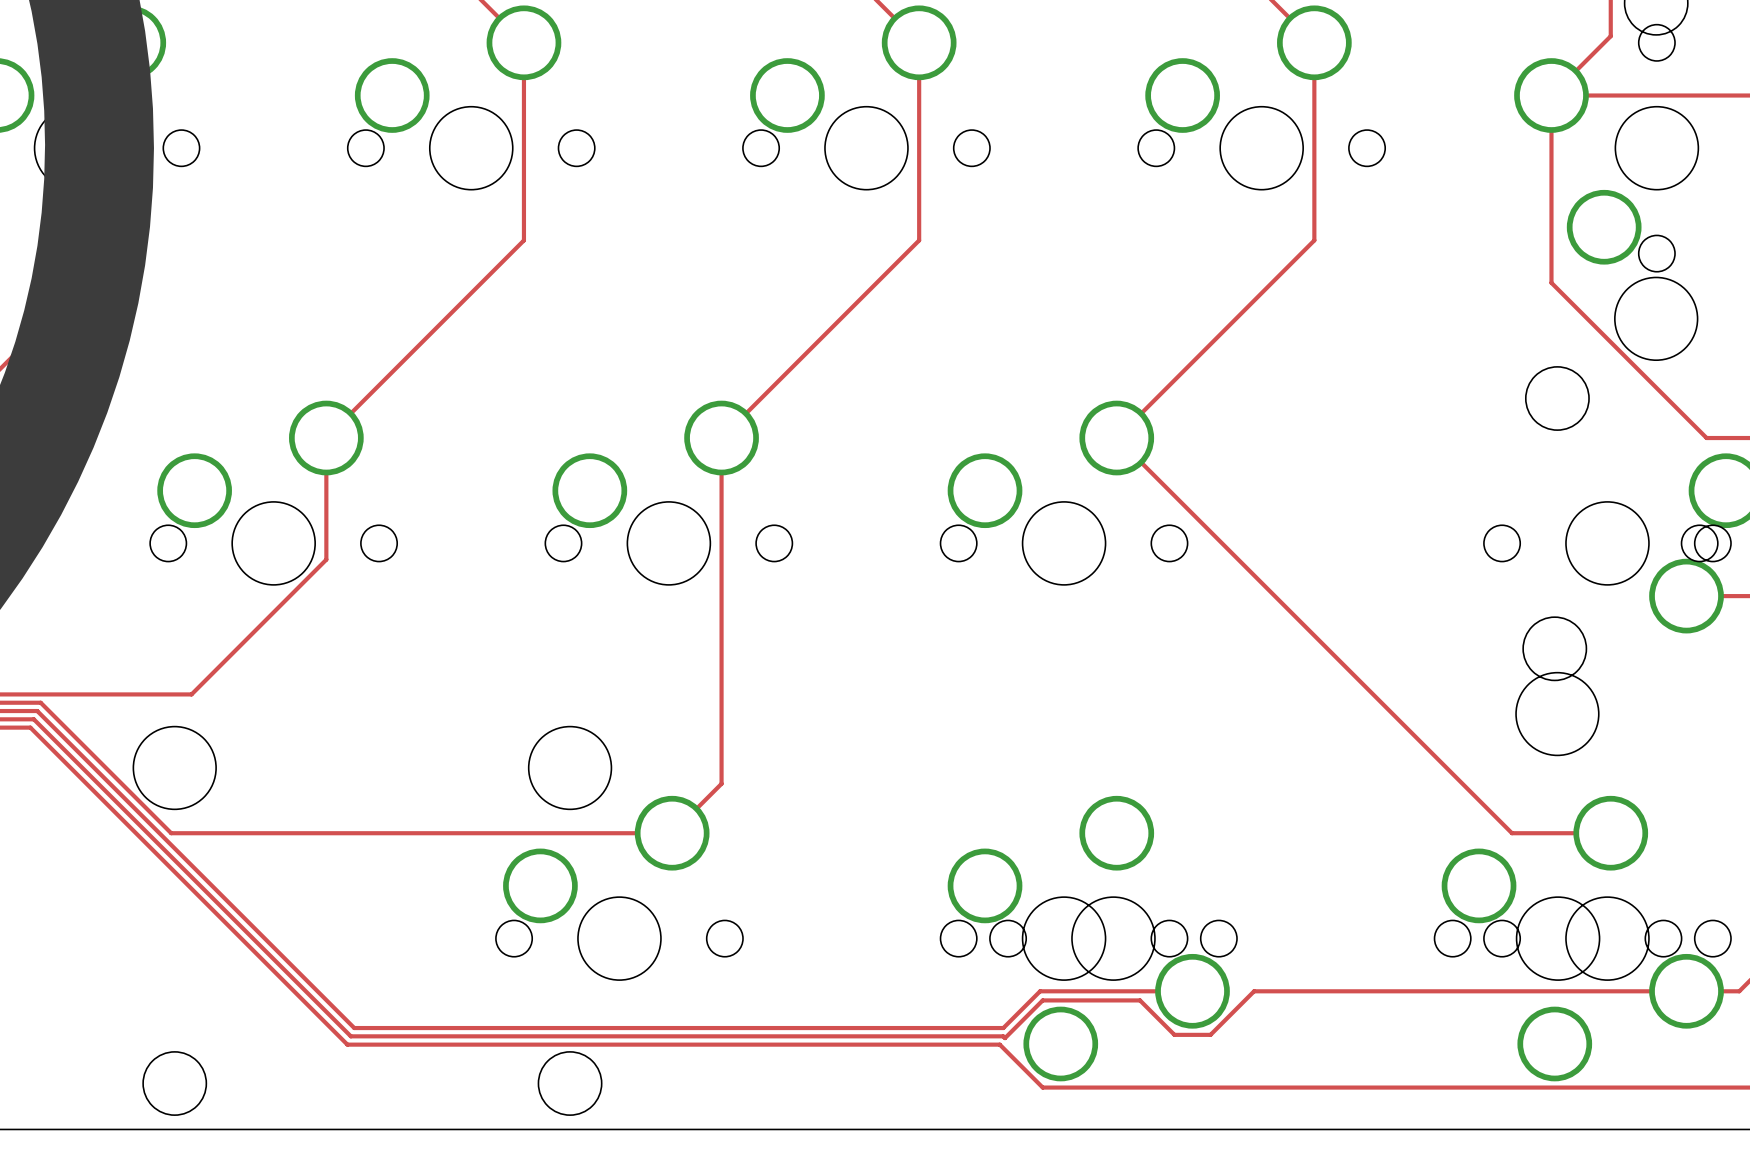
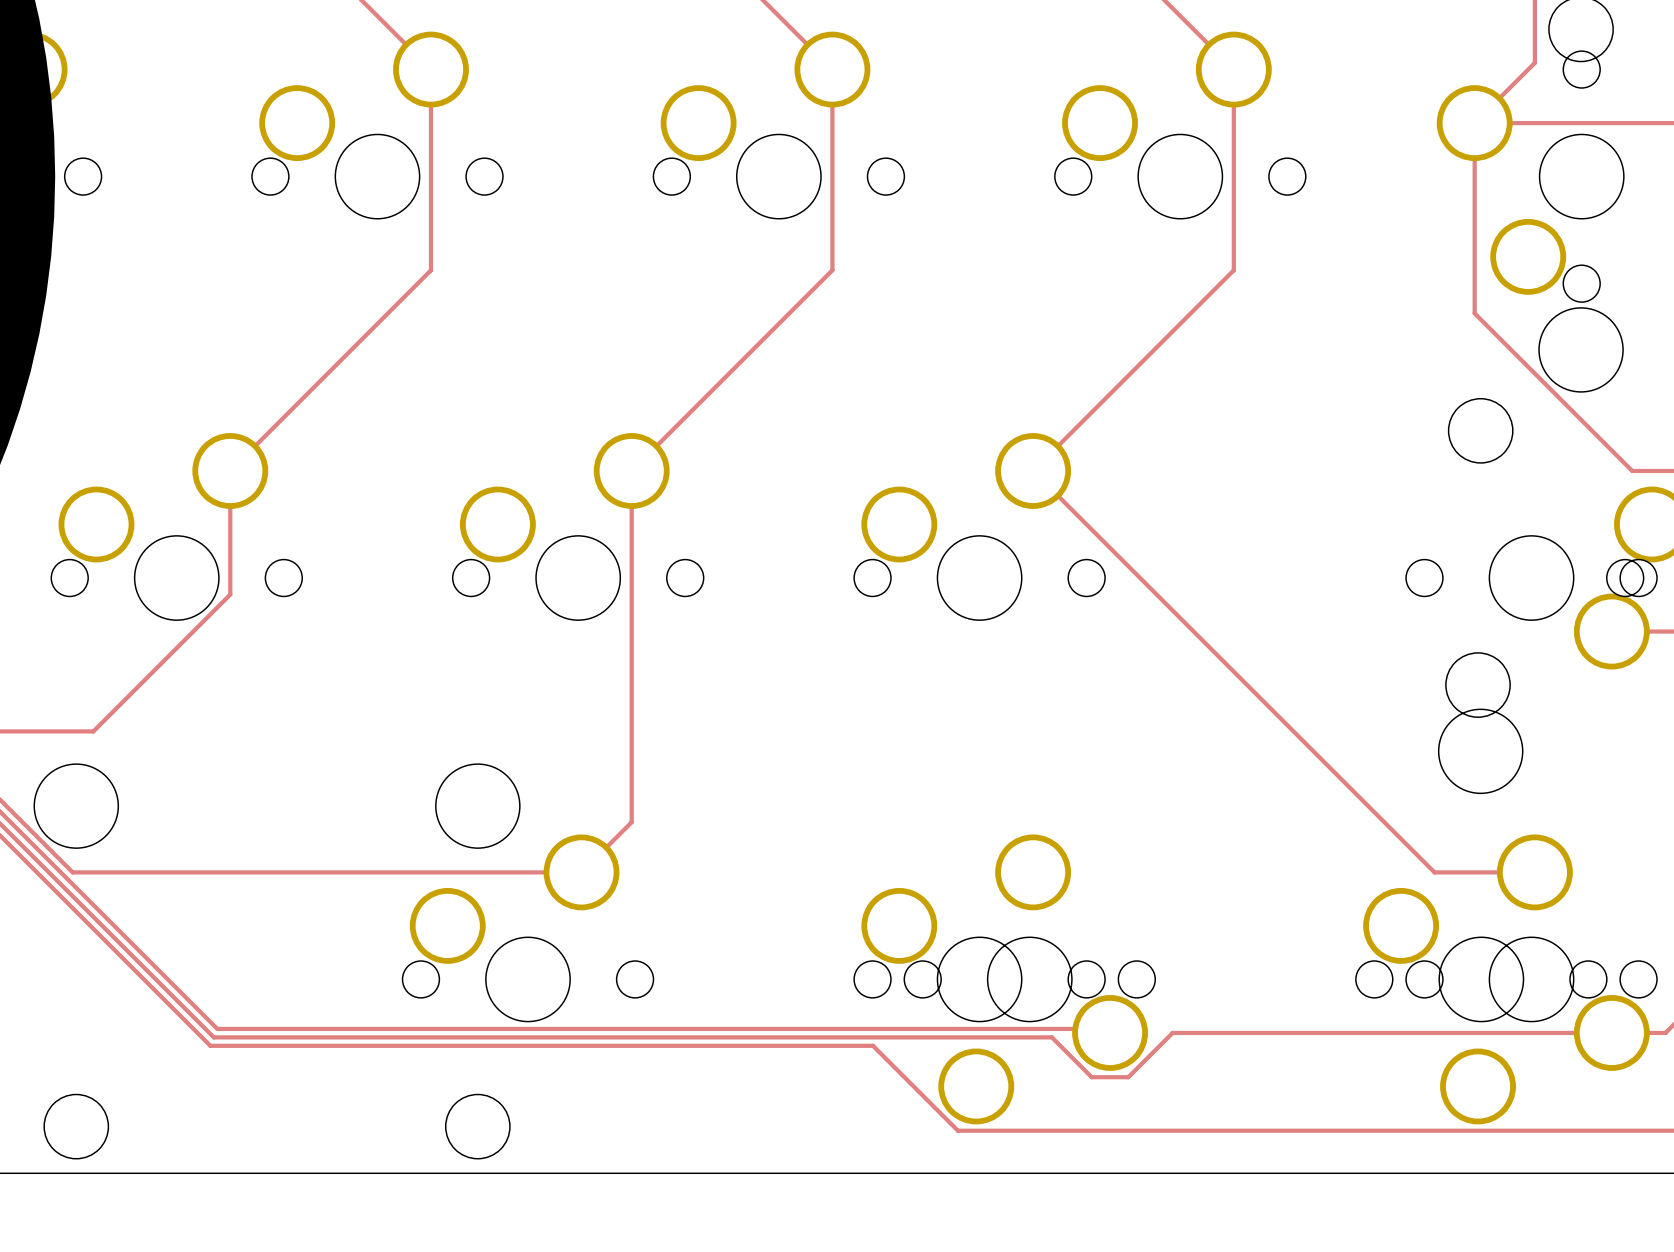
track: (313, 987) (354, 1028) (1003, 1028) (1040, 991) (1192, 991) -> (217, 1028) (1106, 1028) (1110, 1032)
track: (310, 995) (350, 1036) (1003, 1036) (1005, 1038) (1042, 1000) (1140, 1000) -> (213, 1037) (1051, 1037) (1056, 1042)
track: (306, 1003) (347, 1044) (999, 1044) -> (210, 1045) (873, 1045) (914, 1087)

